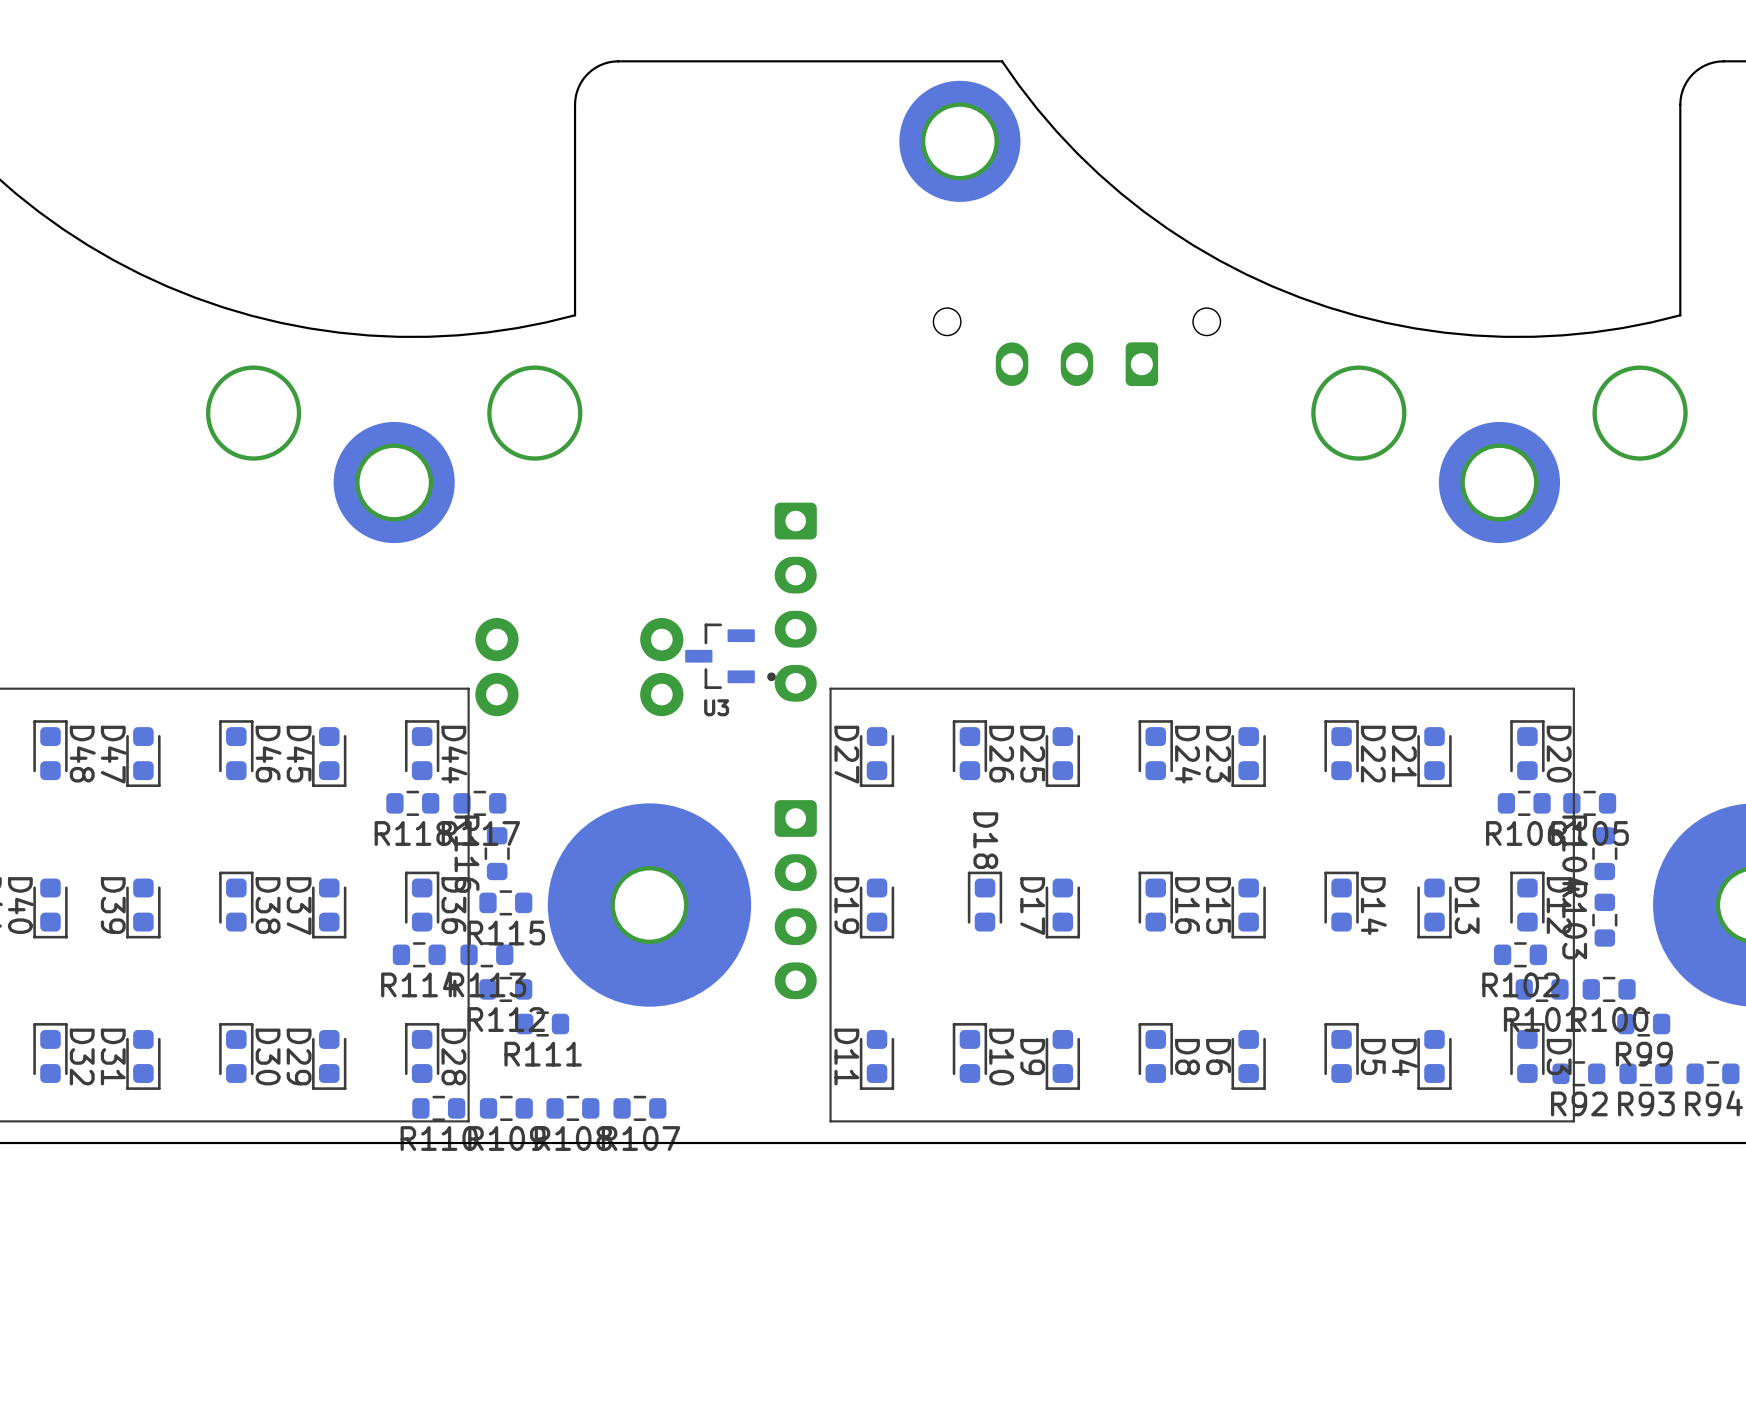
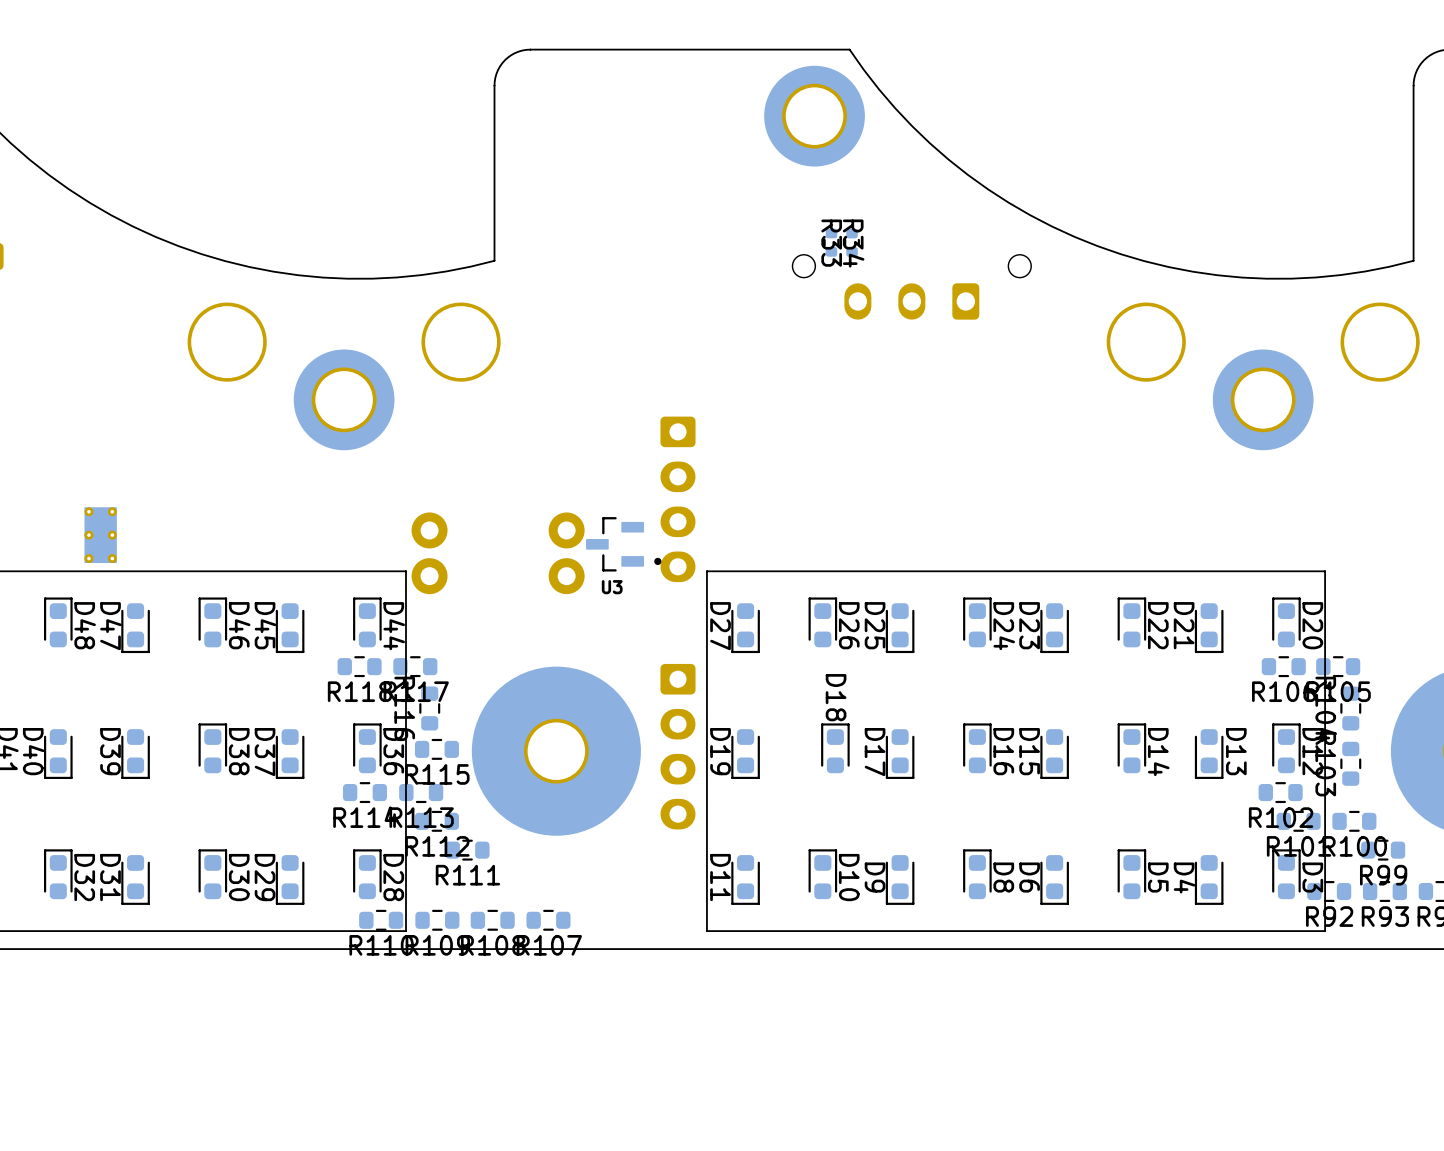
R34: none -> (831, 242)
R33: none -> (852, 242)
part: none -> (100, 535)

